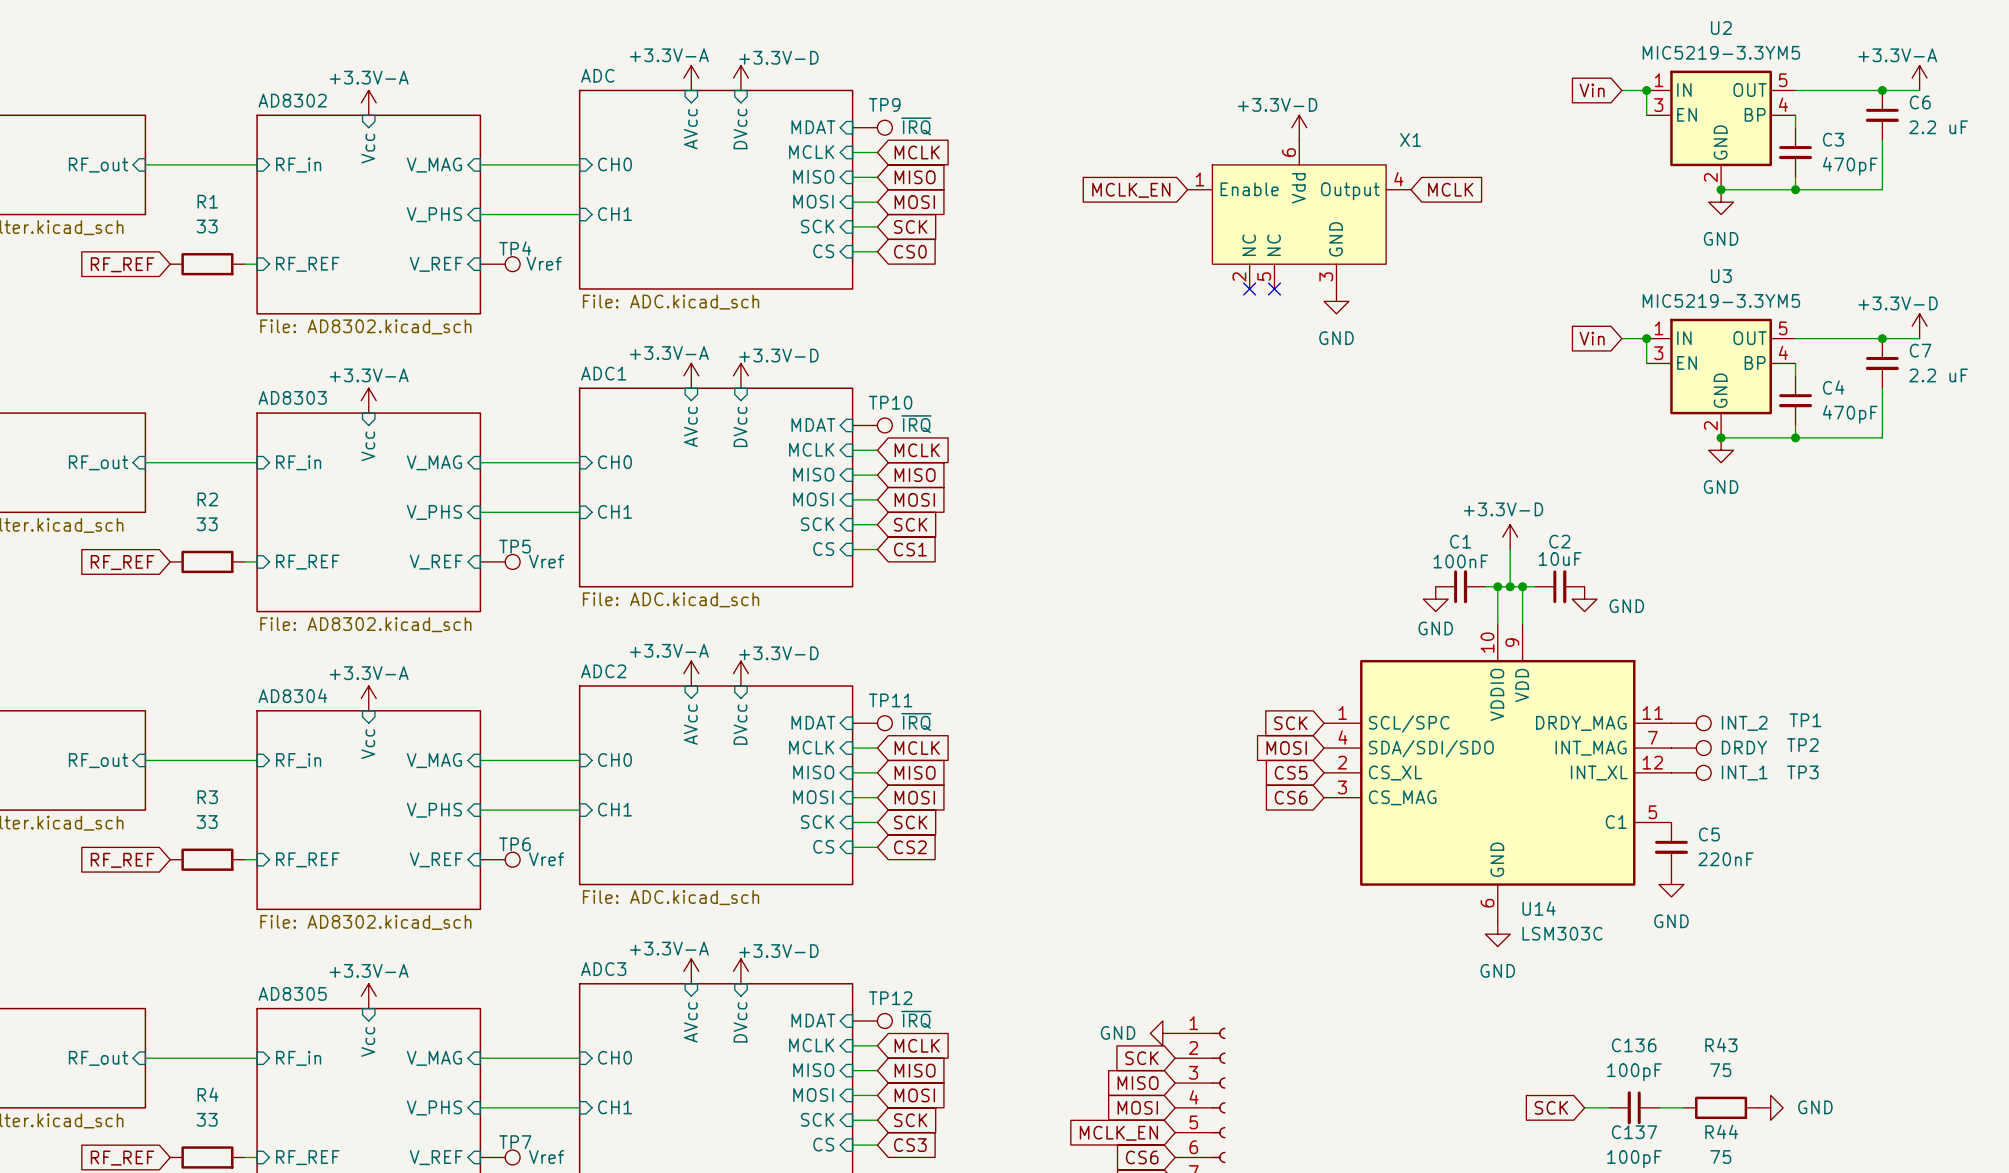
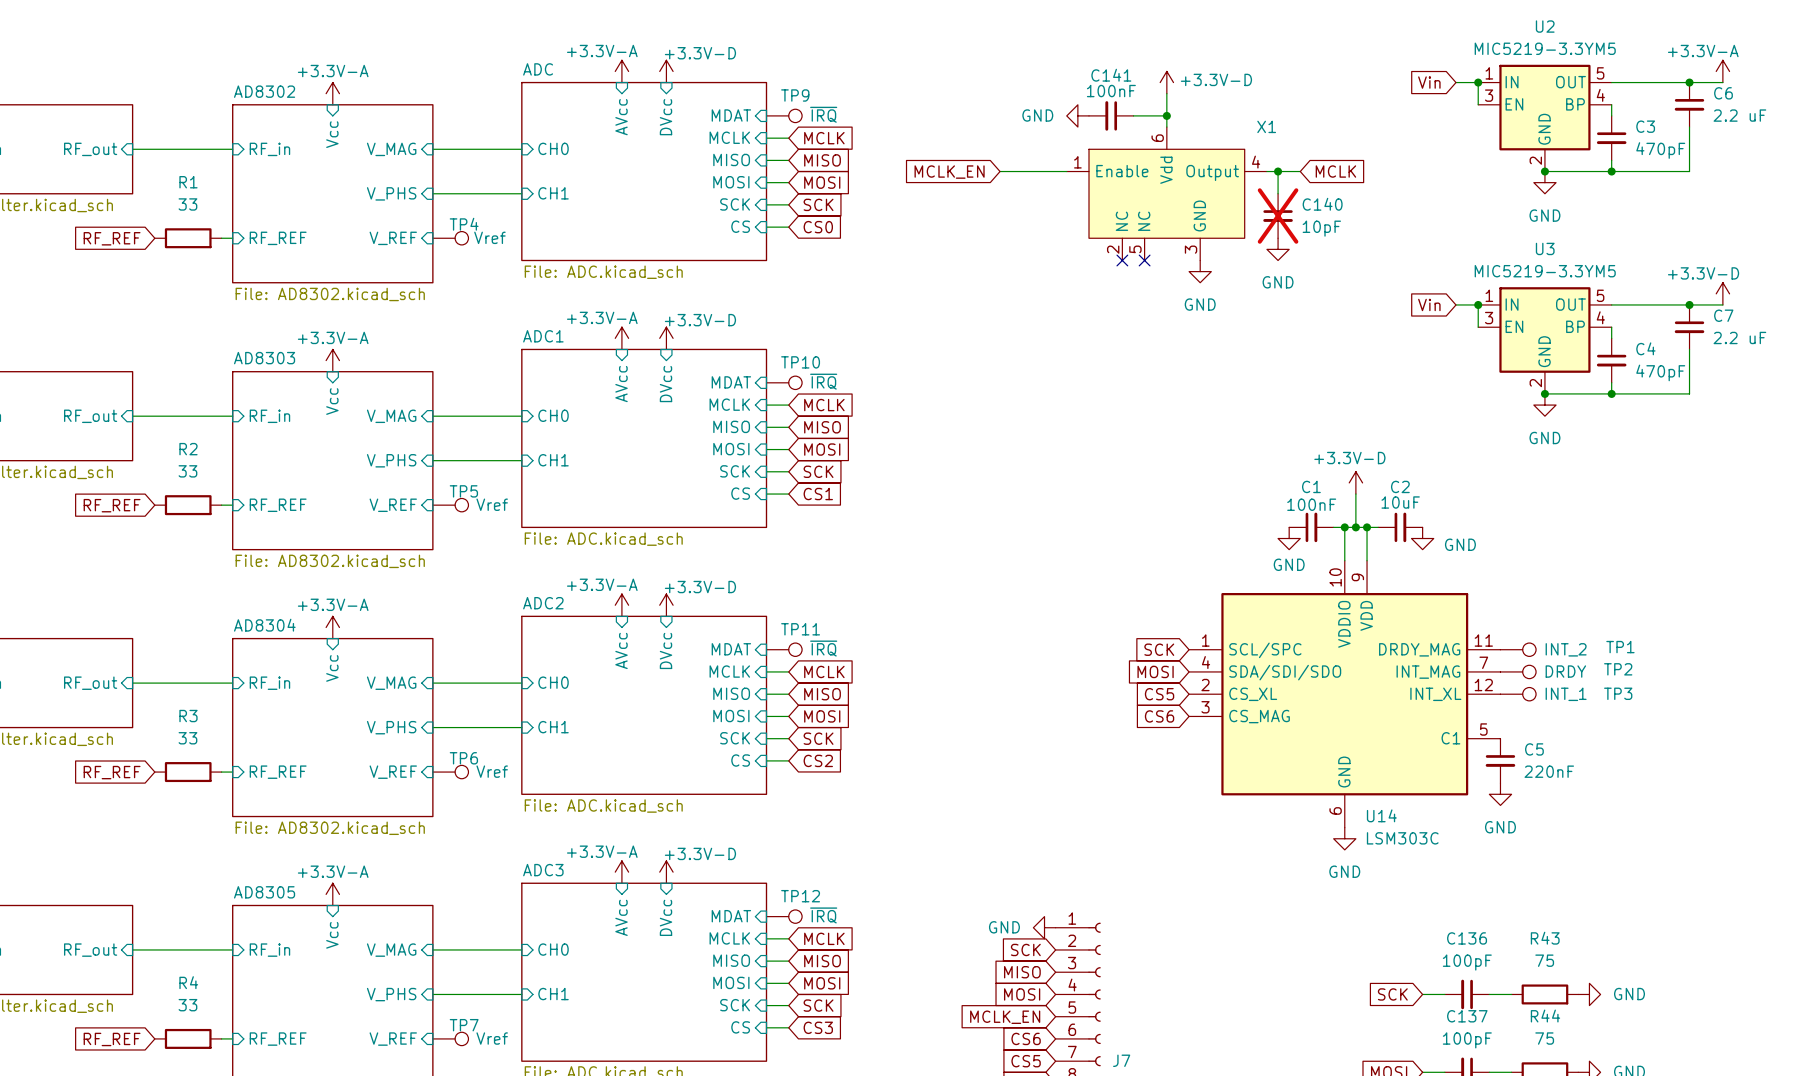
power symbol text position: +3.3V-D (1277, 104) -> +3.3V-D (1216, 79)
power symbol: none -> GND (1077, 115)
C141: none -> 100nF (1111, 115)
wire: none -> (1133, 115) (1166, 115)
power symbol position: +3.3V-D (1299, 127) -> +3.3V-D (1166, 82)
junction: none -> (1166, 115)
wire: none -> (1000, 171) (1066, 171)
wire: none -> (1266, 171) (1300, 171)
wire: none -> (1278, 171) (1278, 193)
junction: none -> (1278, 171)
global label position: MCLK (1450, 189) -> MCLK (1335, 171)
global label position: MCLK_EN (1131, 190) -> MCLK_EN (949, 172)
C140: none -> 10pF (1278, 216)
power symbol: none -> GND (1278, 249)

